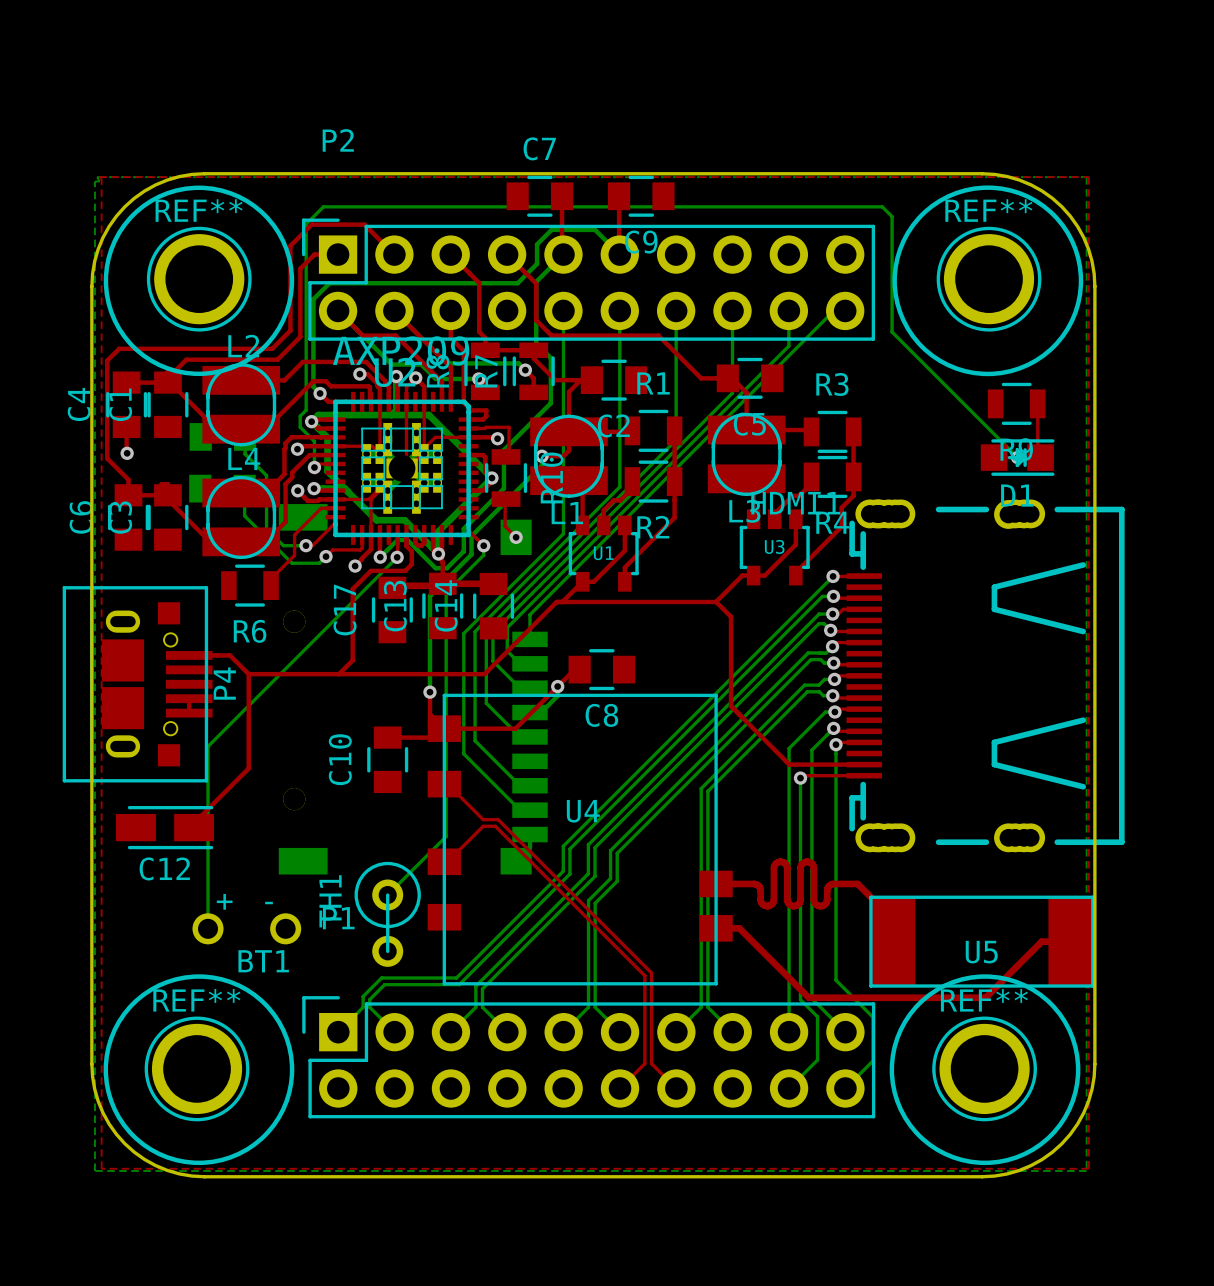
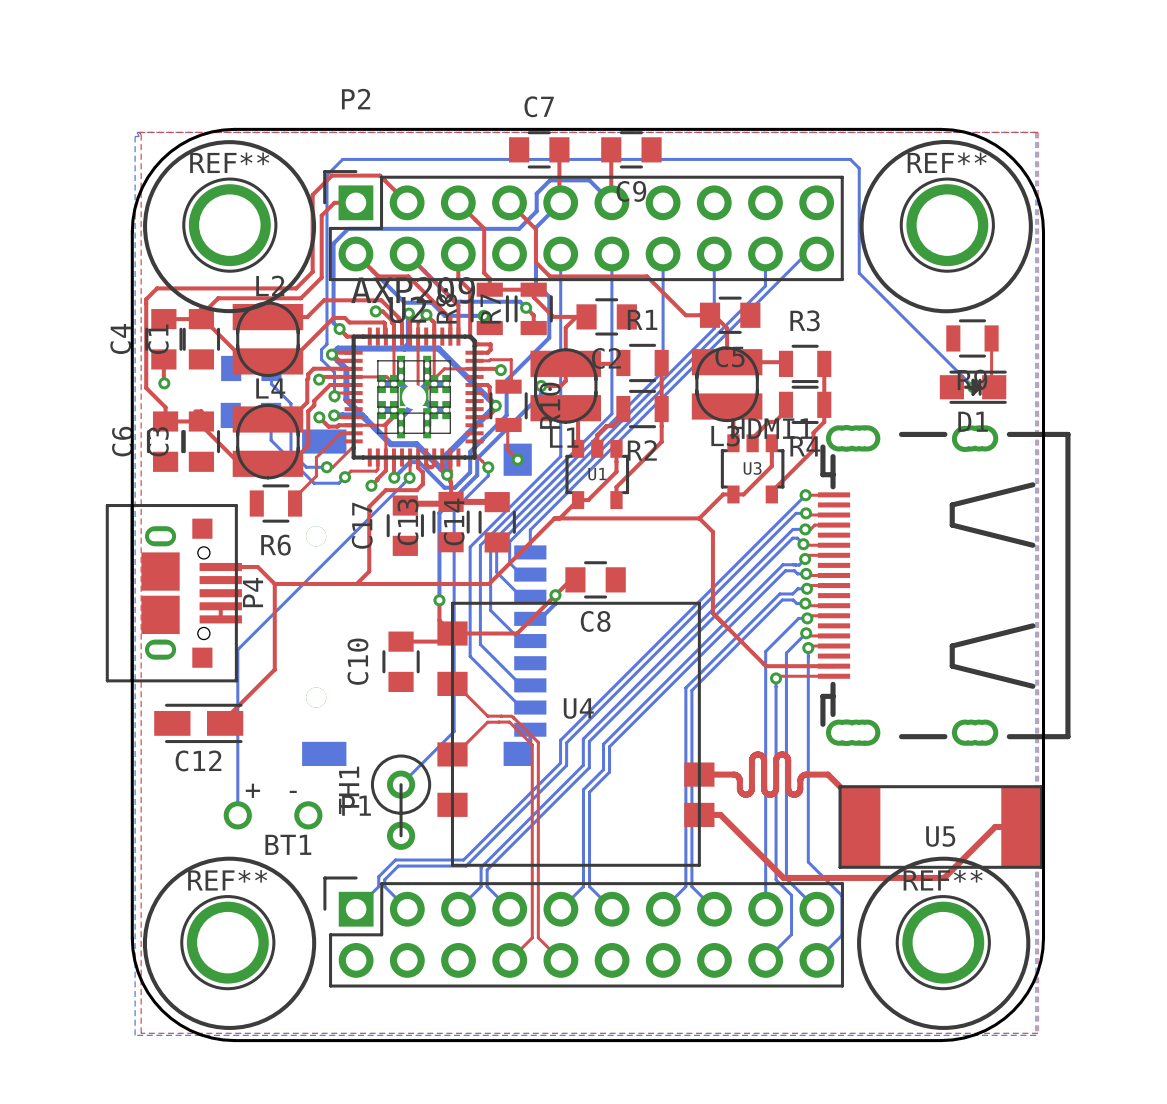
top track: (498, 819) (651, 972) (651, 1063) (676, 1088) -> (501, 716) (513, 717)
top track: none -> (513, 717) (538, 742) (538, 937) (560, 960)
top track: (495, 826) (644, 975) (644, 1063) (620, 1088) -> (498, 722) (509, 722) (532, 744) (532, 937) (509, 960)

